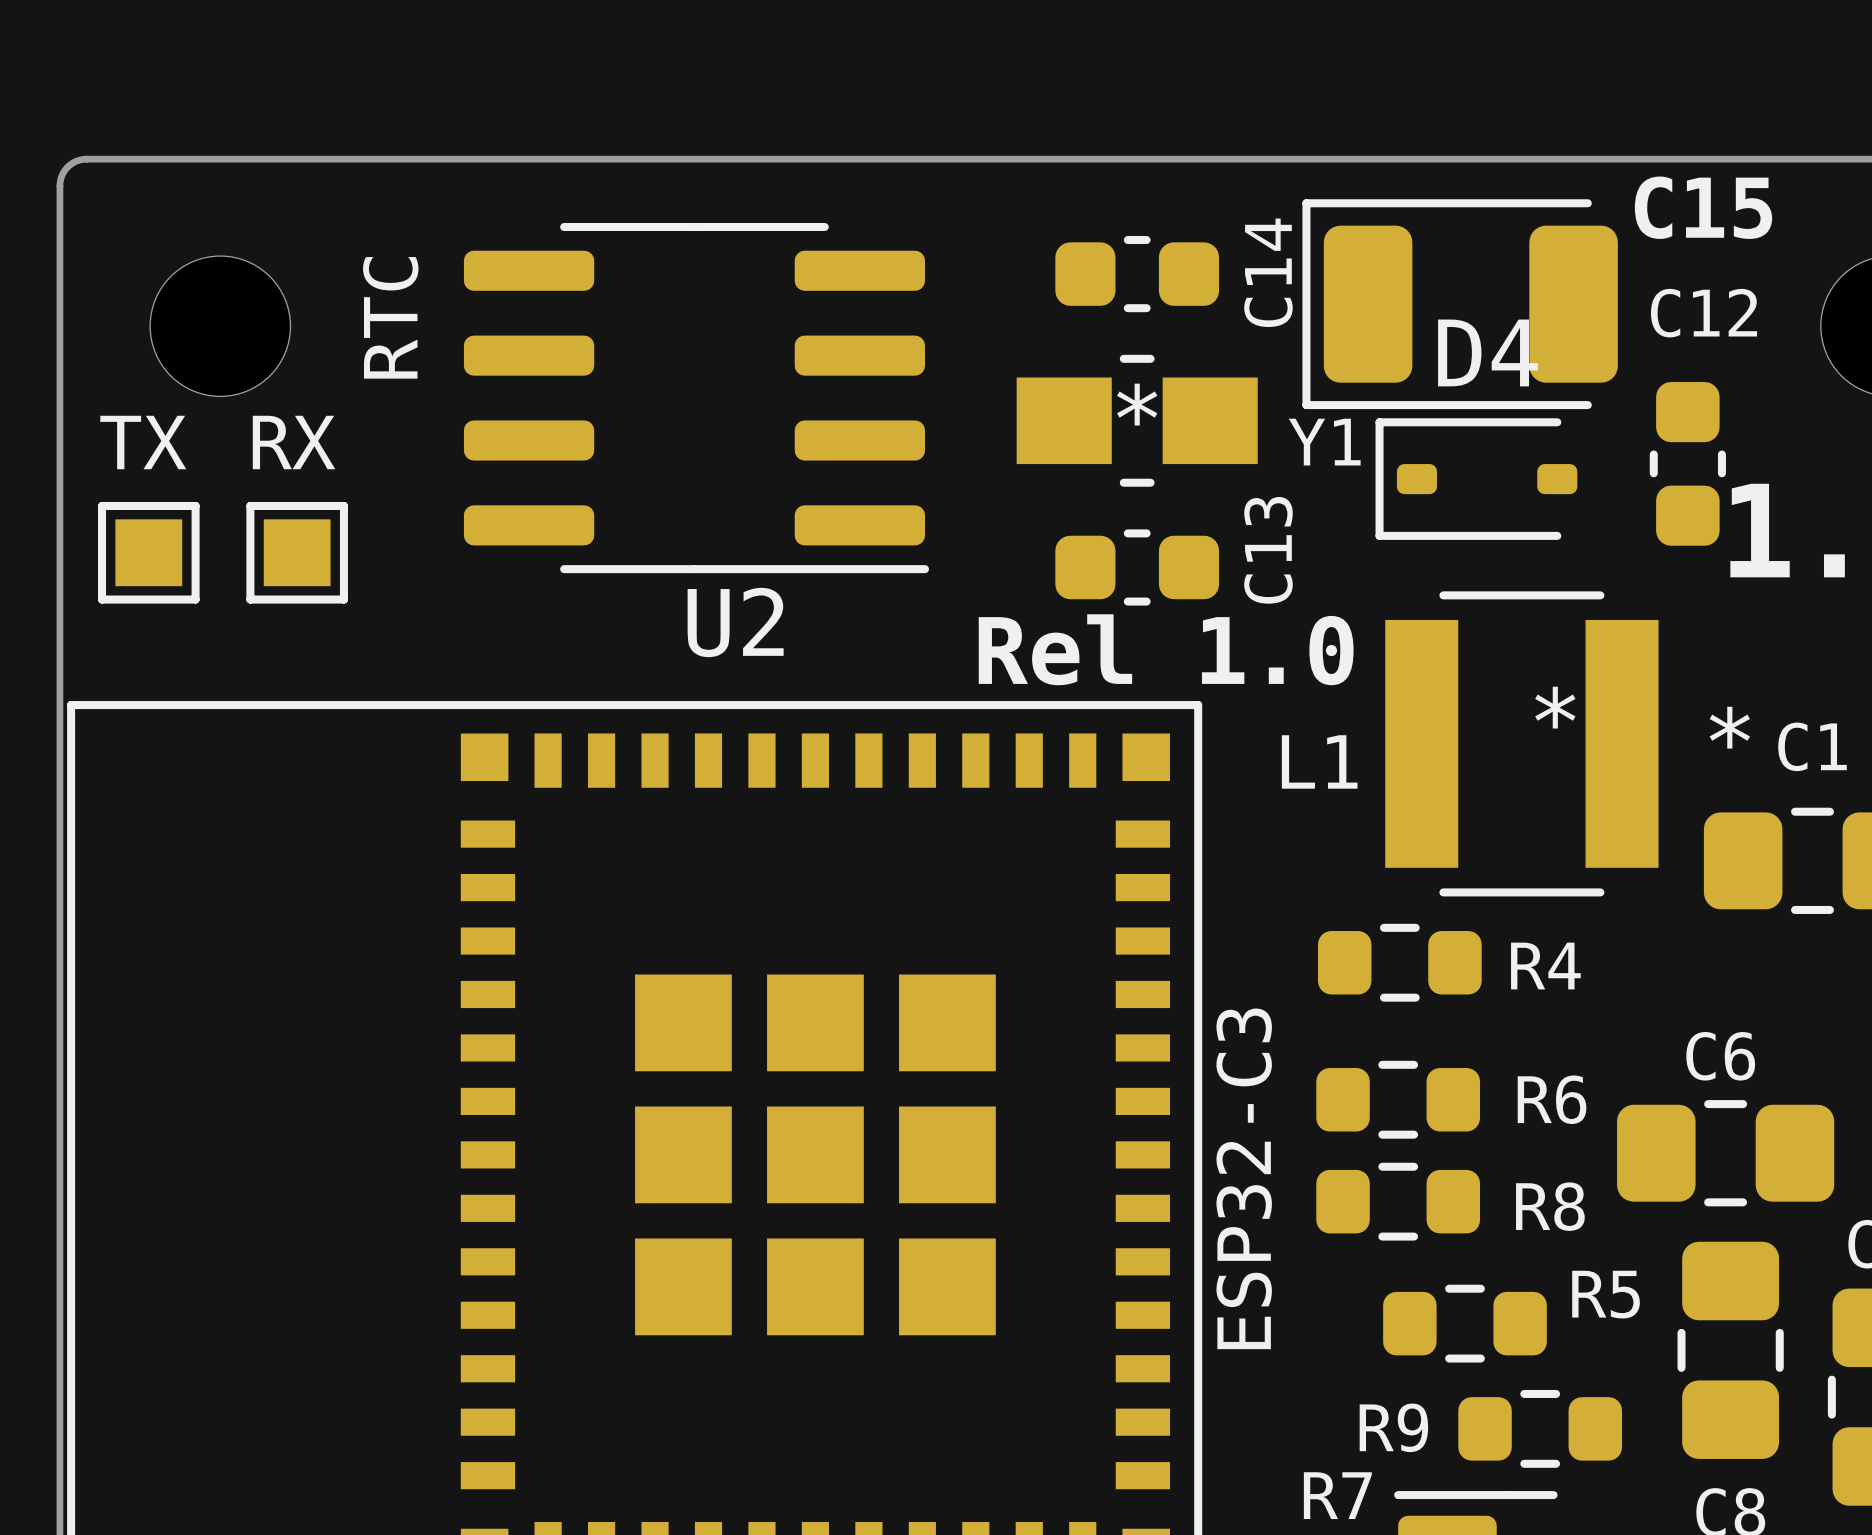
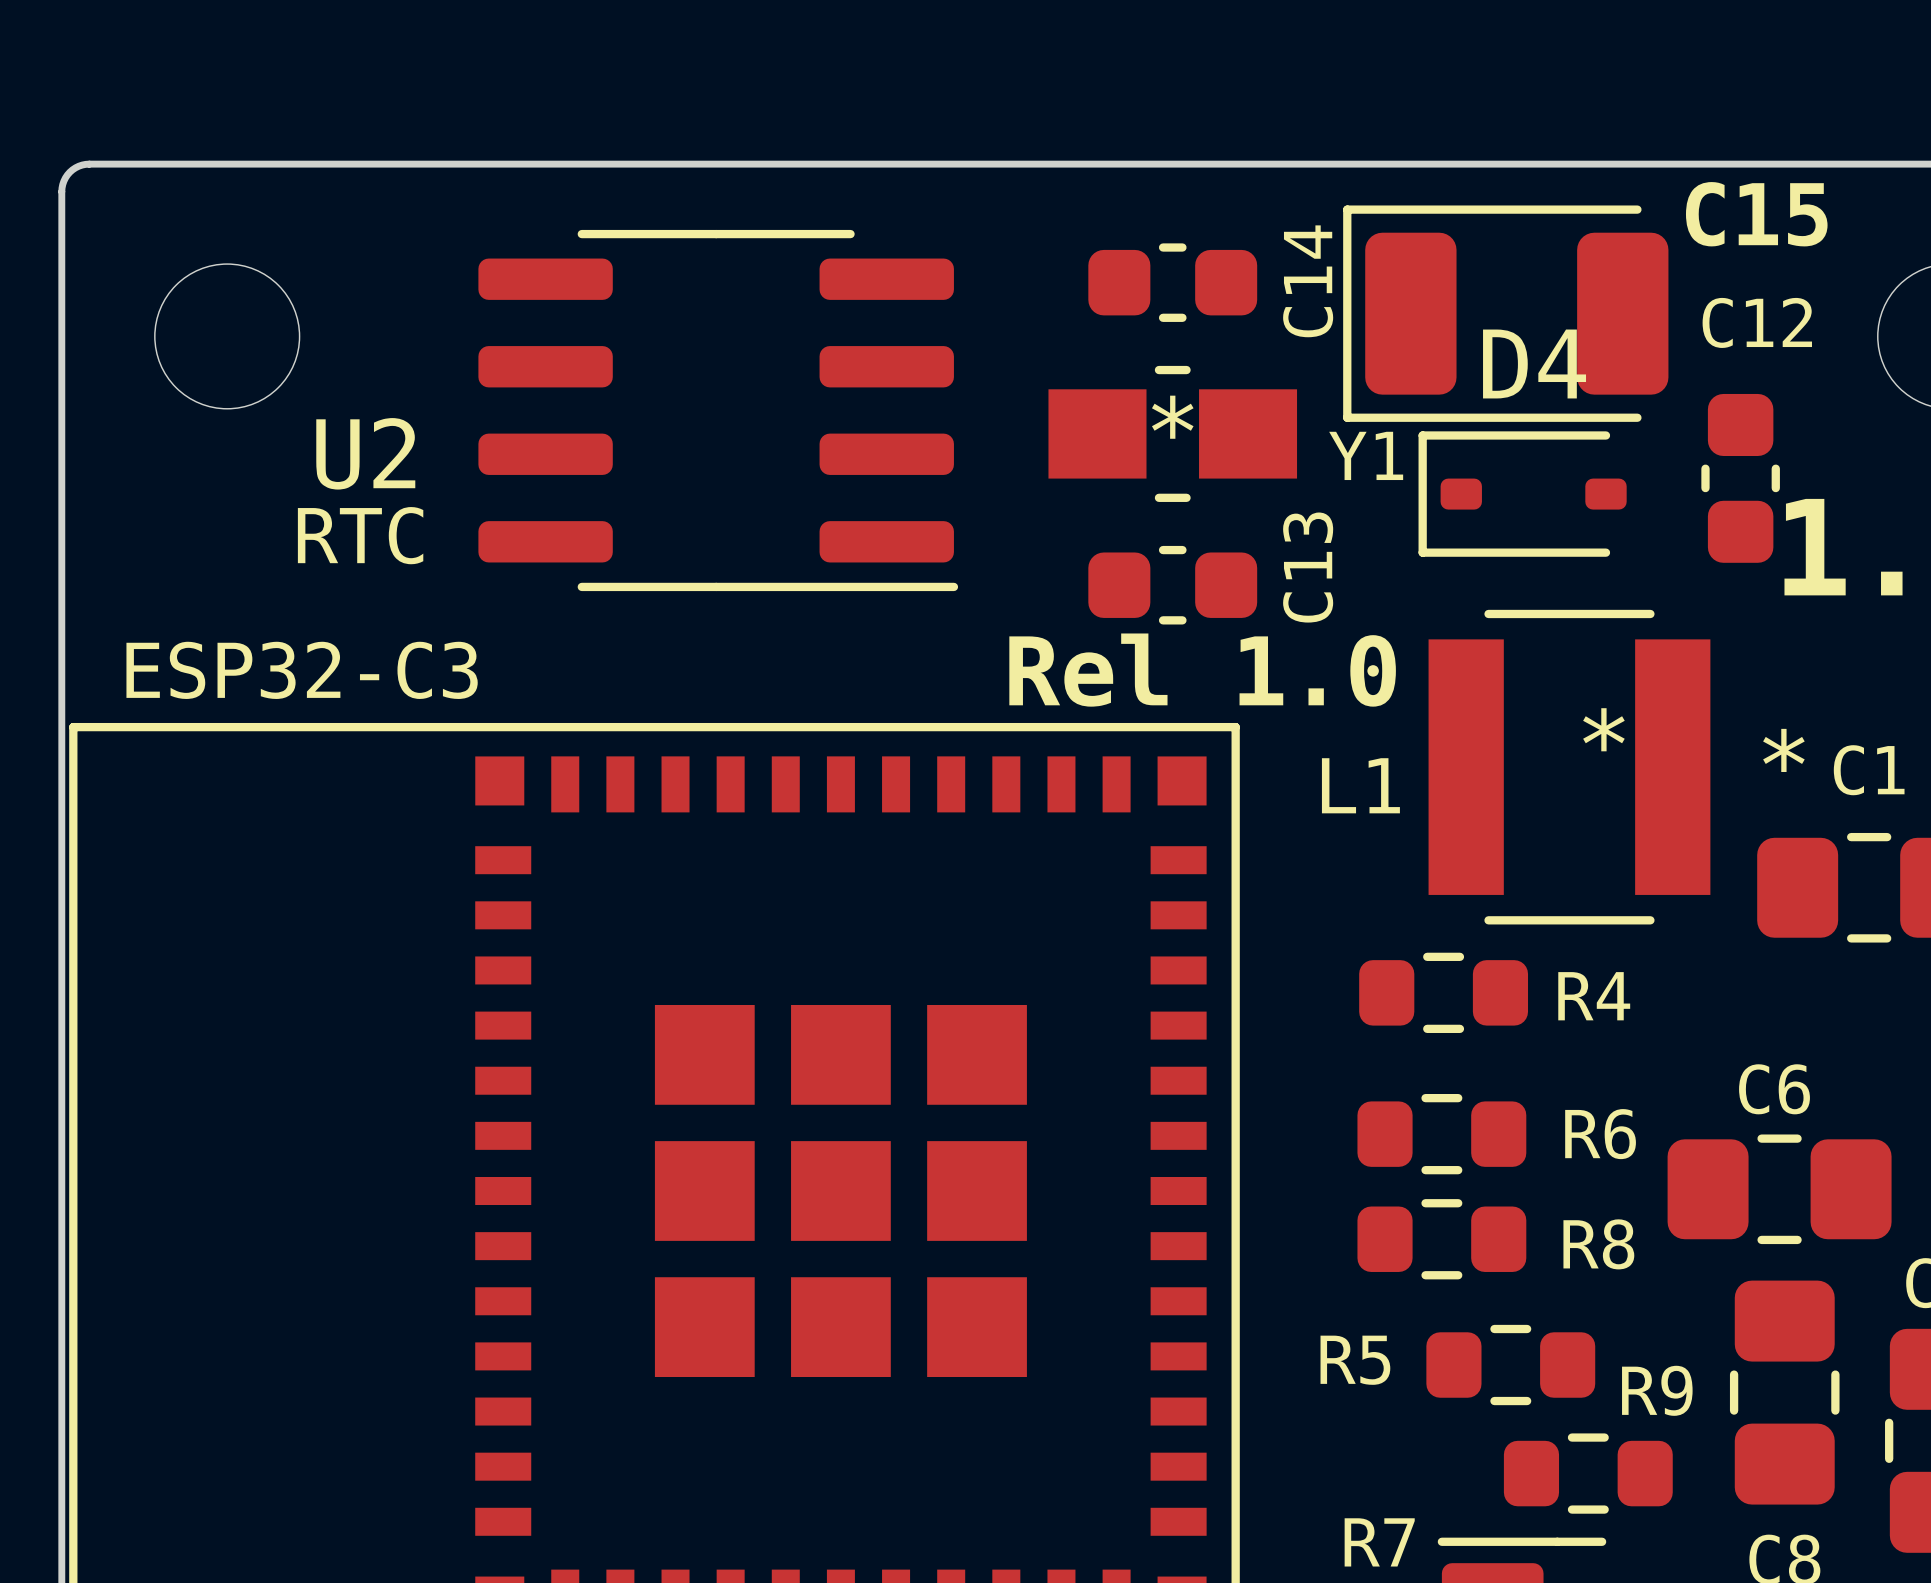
text rotation: 0° (390, 317) -> 90° clockwise (360, 535)
text position: RTC (390, 317) -> RTC (360, 535)
text: TX (143, 442) -> none
text: RX (294, 442) -> none
part: (148, 552) -> none
part: (297, 552) -> none
U2 name position: U2 (735, 622) -> U2 (365, 453)
text rotation: 0° (1244, 1178) -> 90° clockwise (302, 670)
text position: ESP32-C3 (1244, 1178) -> ESP32-C3 (302, 670)
R5 name position: R5 (1606, 1294) -> R5 (1355, 1360)
R9 name position: R9 (1393, 1427) -> R9 (1657, 1390)

